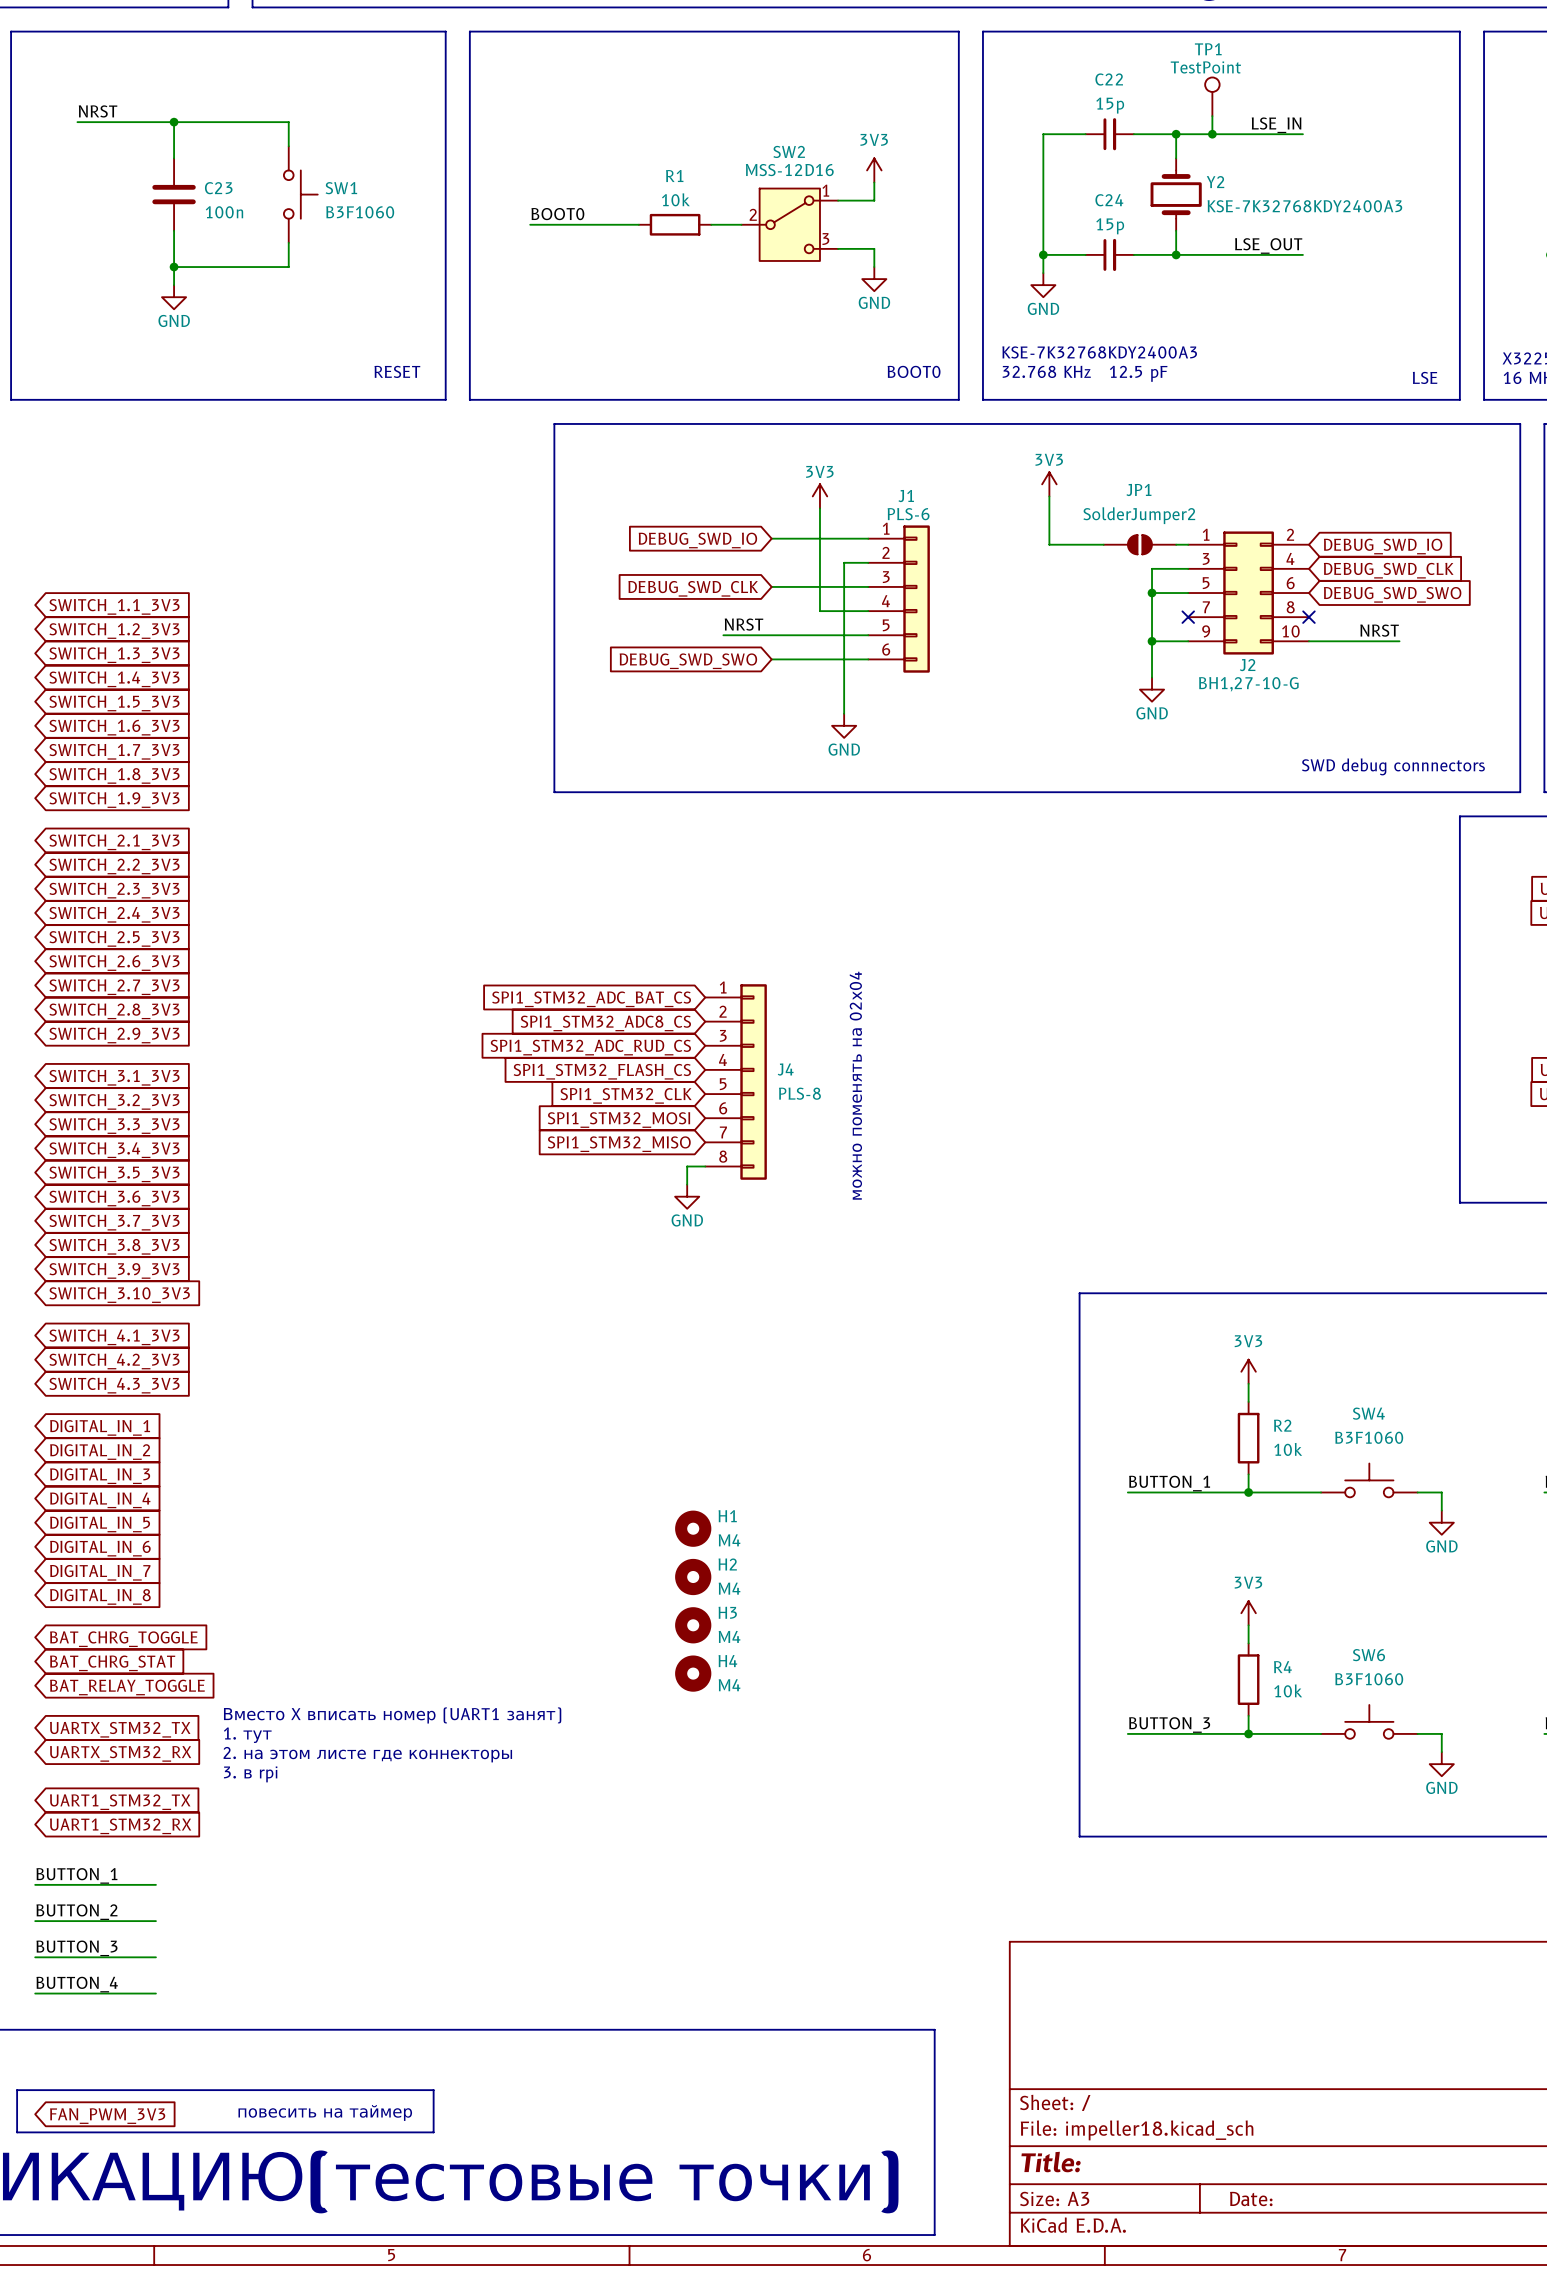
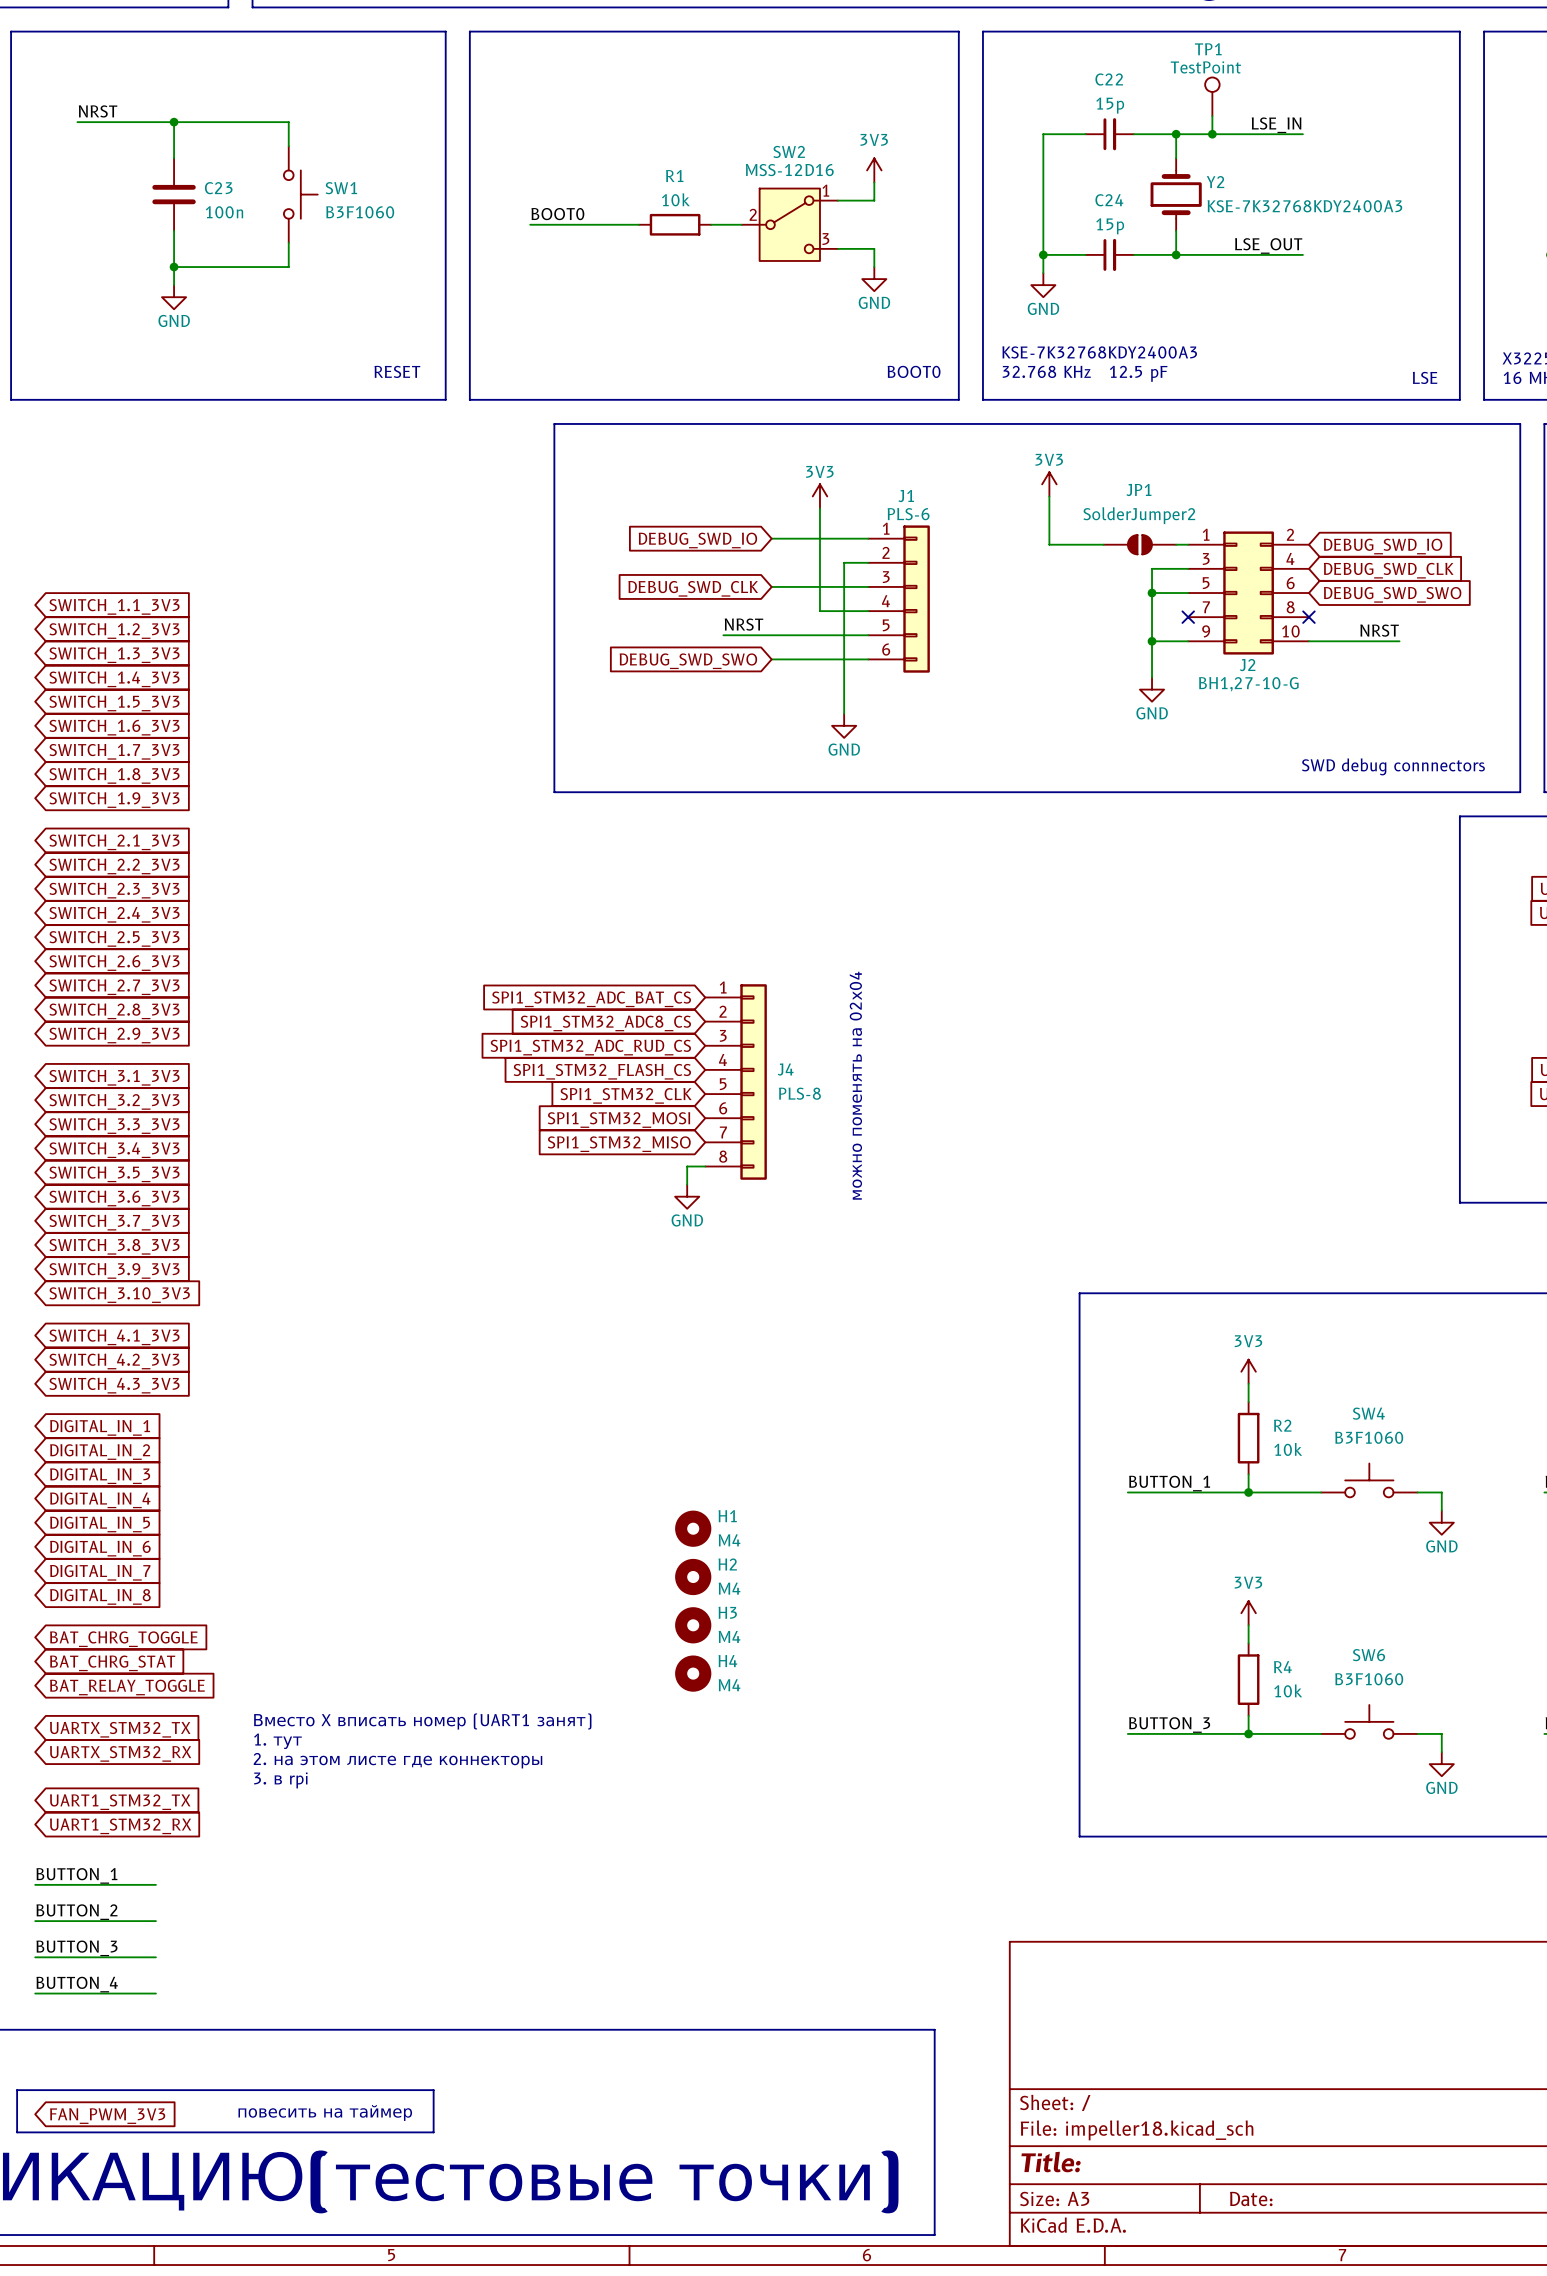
text position: Вместо X вписать номер (UART1 занят) (392, 1715) -> Вместо X вписать номер (UART1 занят) (422, 1721)
text position: 1. тут (247, 1735) -> 1. тут (277, 1741)
text position: 2. на этом листе где коннекторы (367, 1754) -> 2. на этом листе где коннекторы (397, 1760)
text position: 3. в rpi (250, 1774) -> 3. в rpi (280, 1780)

